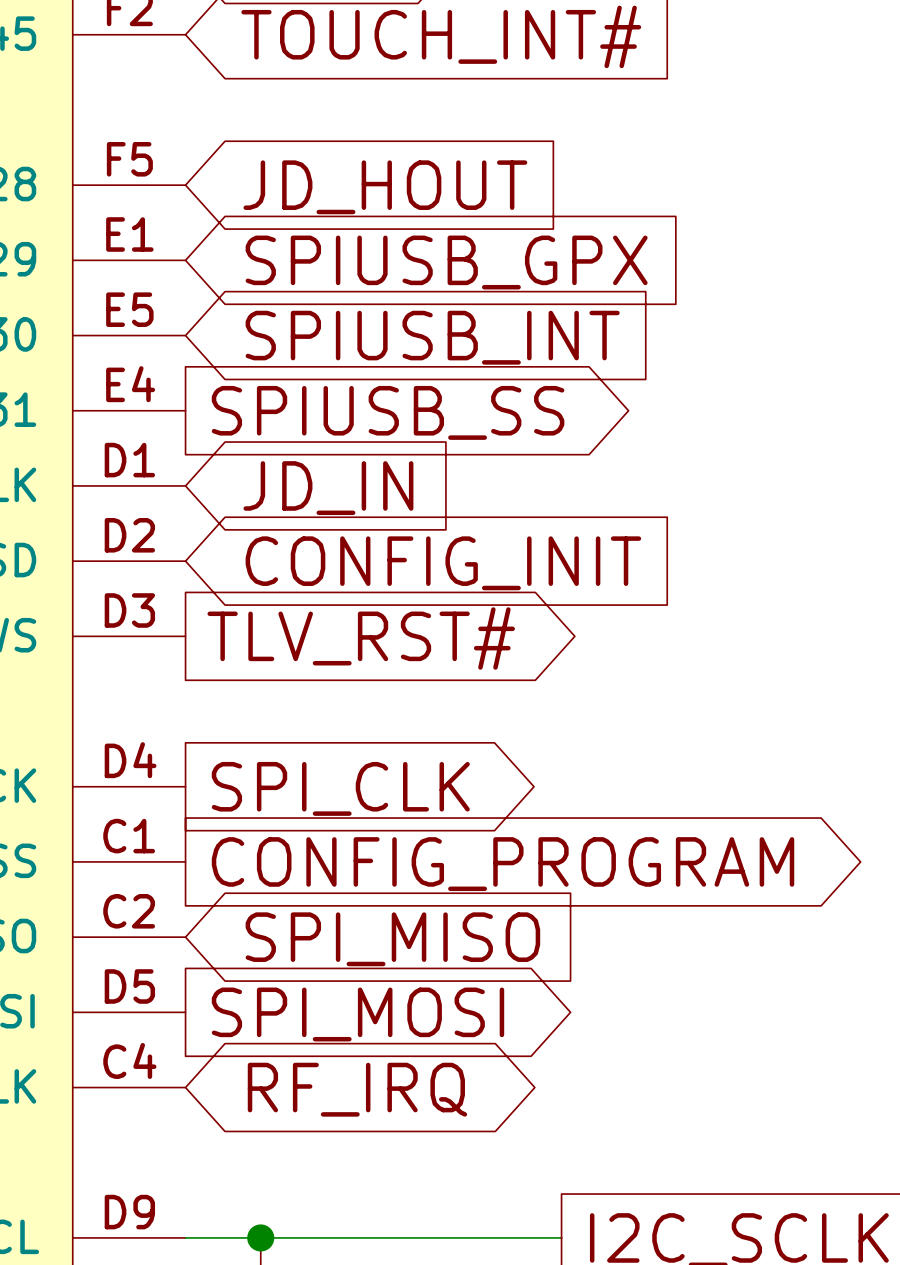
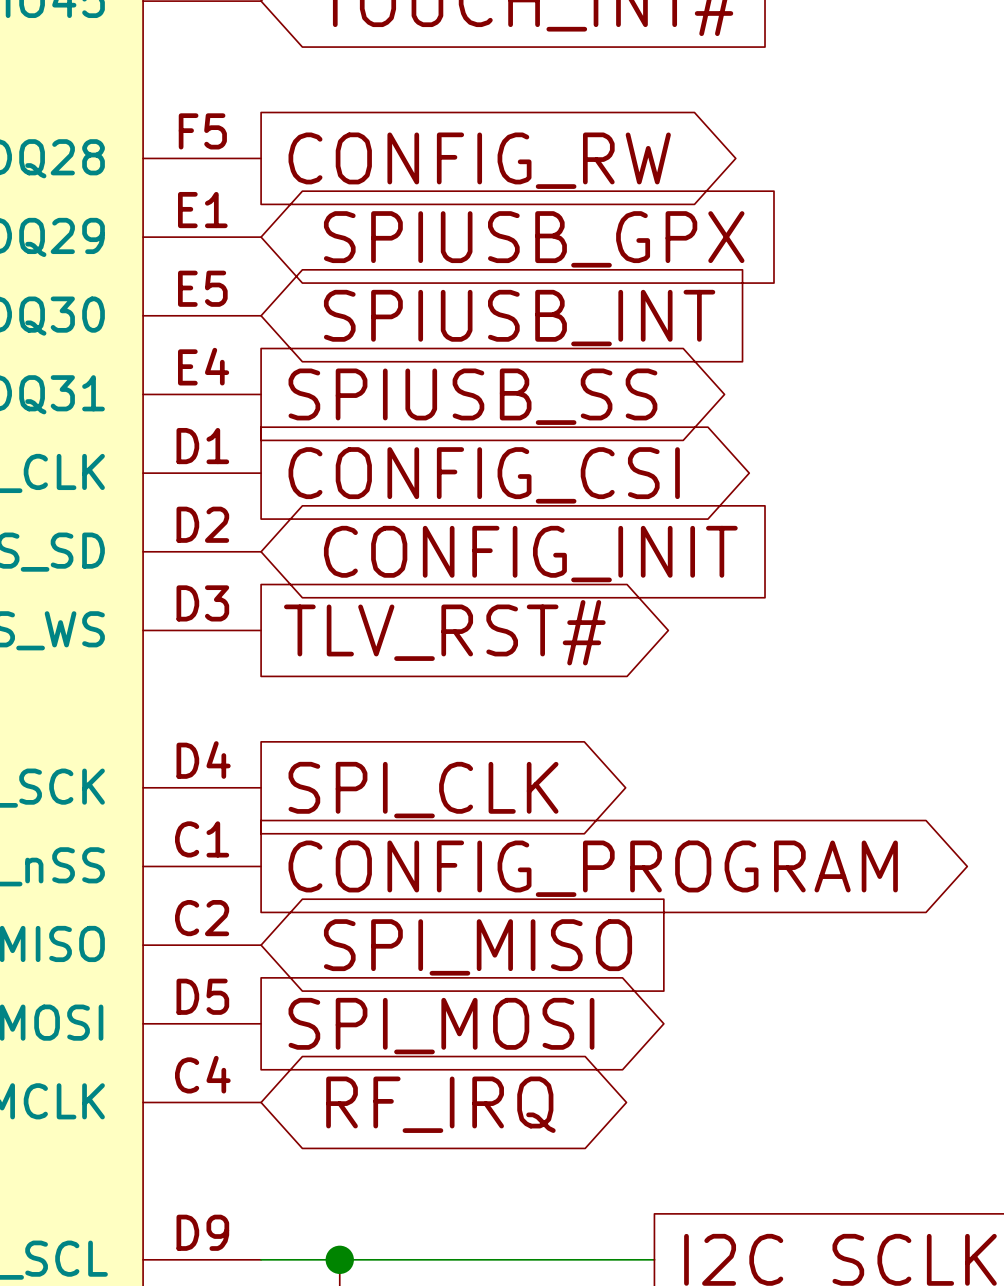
global label shape: input (385, 187) -> output (479, 160)
global label: JD_HOUT (385, 187) -> CONFIG_RW (479, 160)
global label shape: input (328, 488) -> output (484, 475)
global label: JD_IN (328, 488) -> CONFIG_CSI (484, 475)

